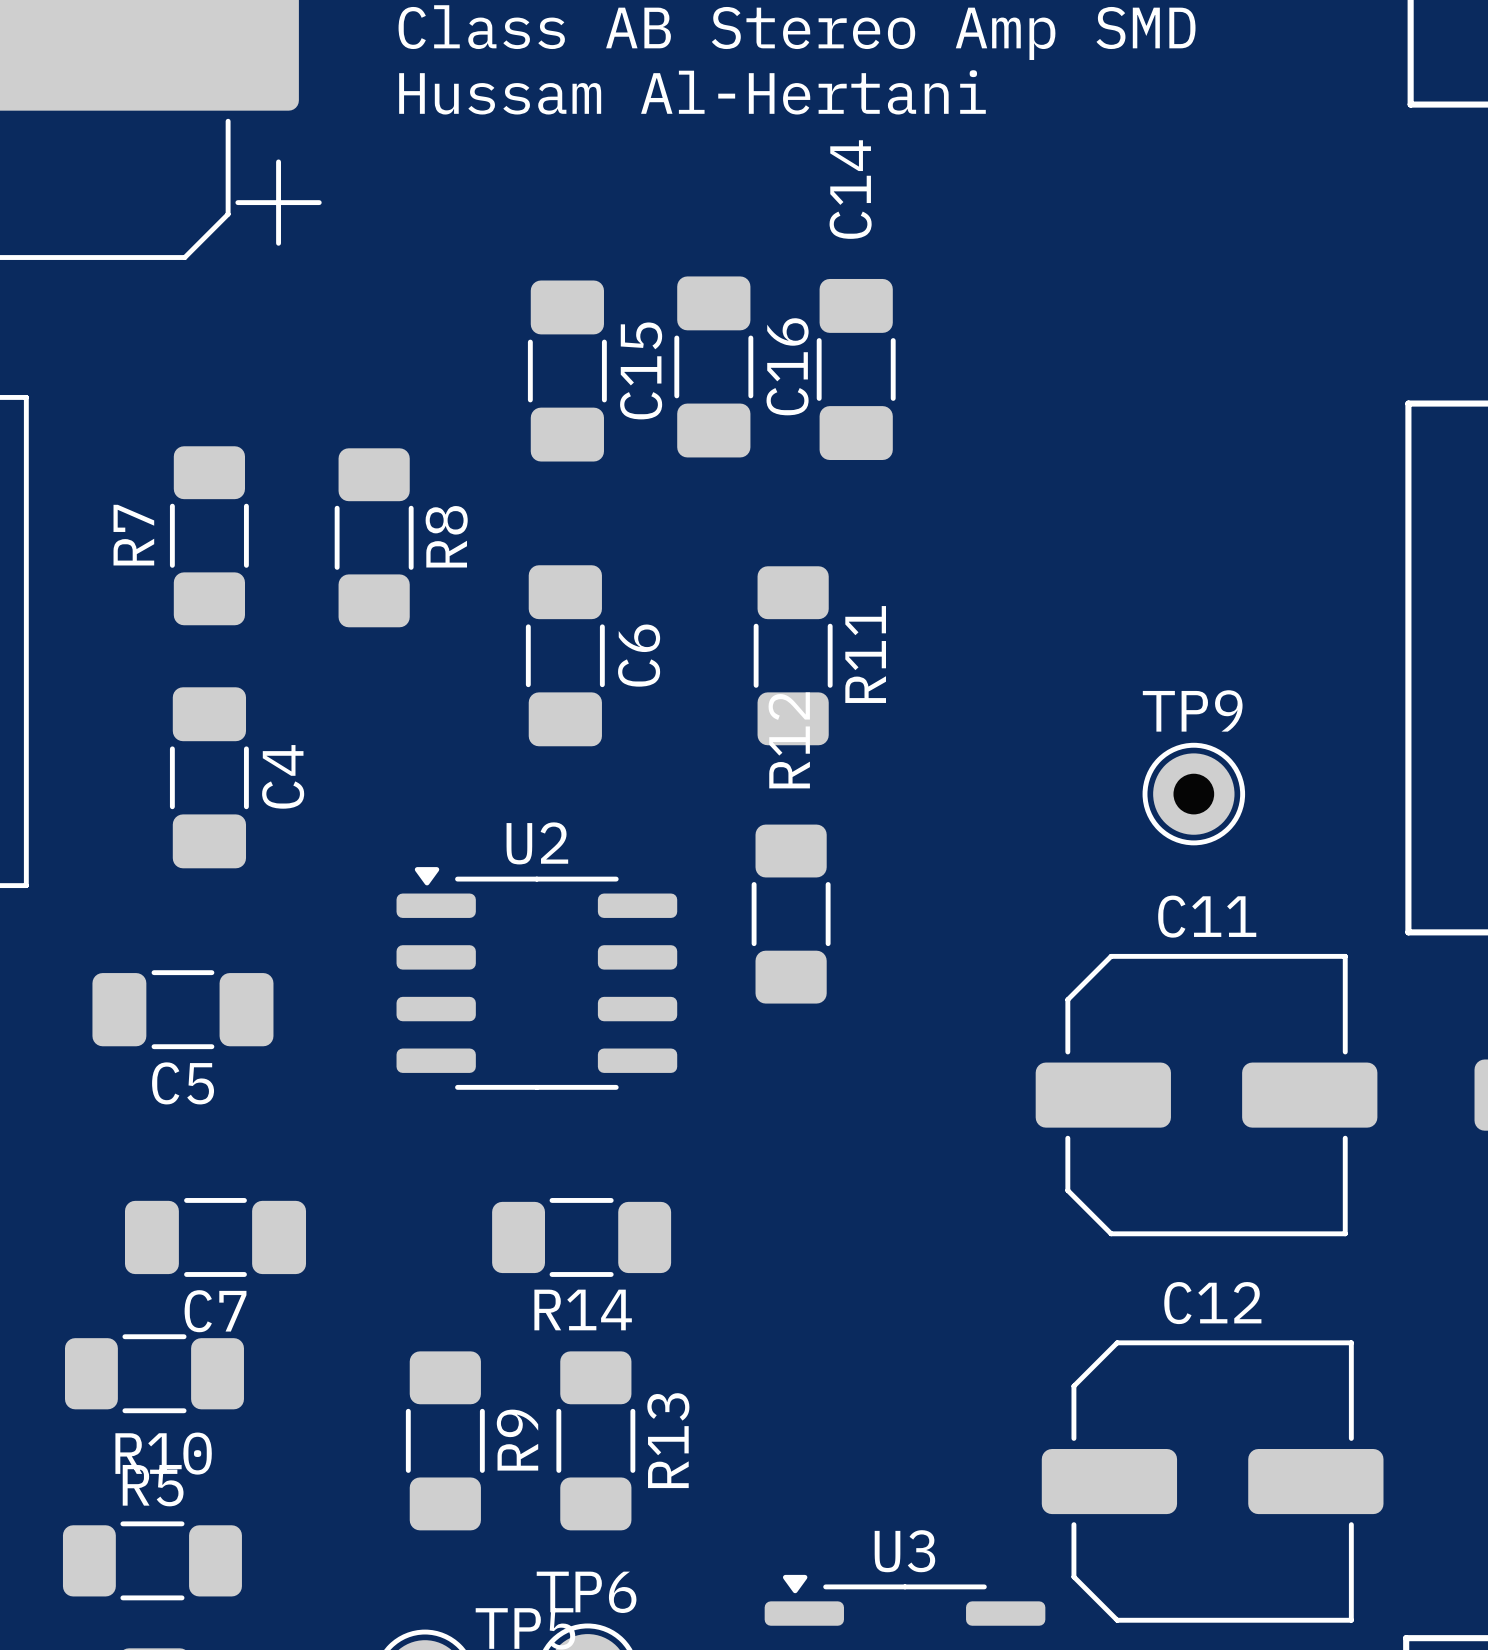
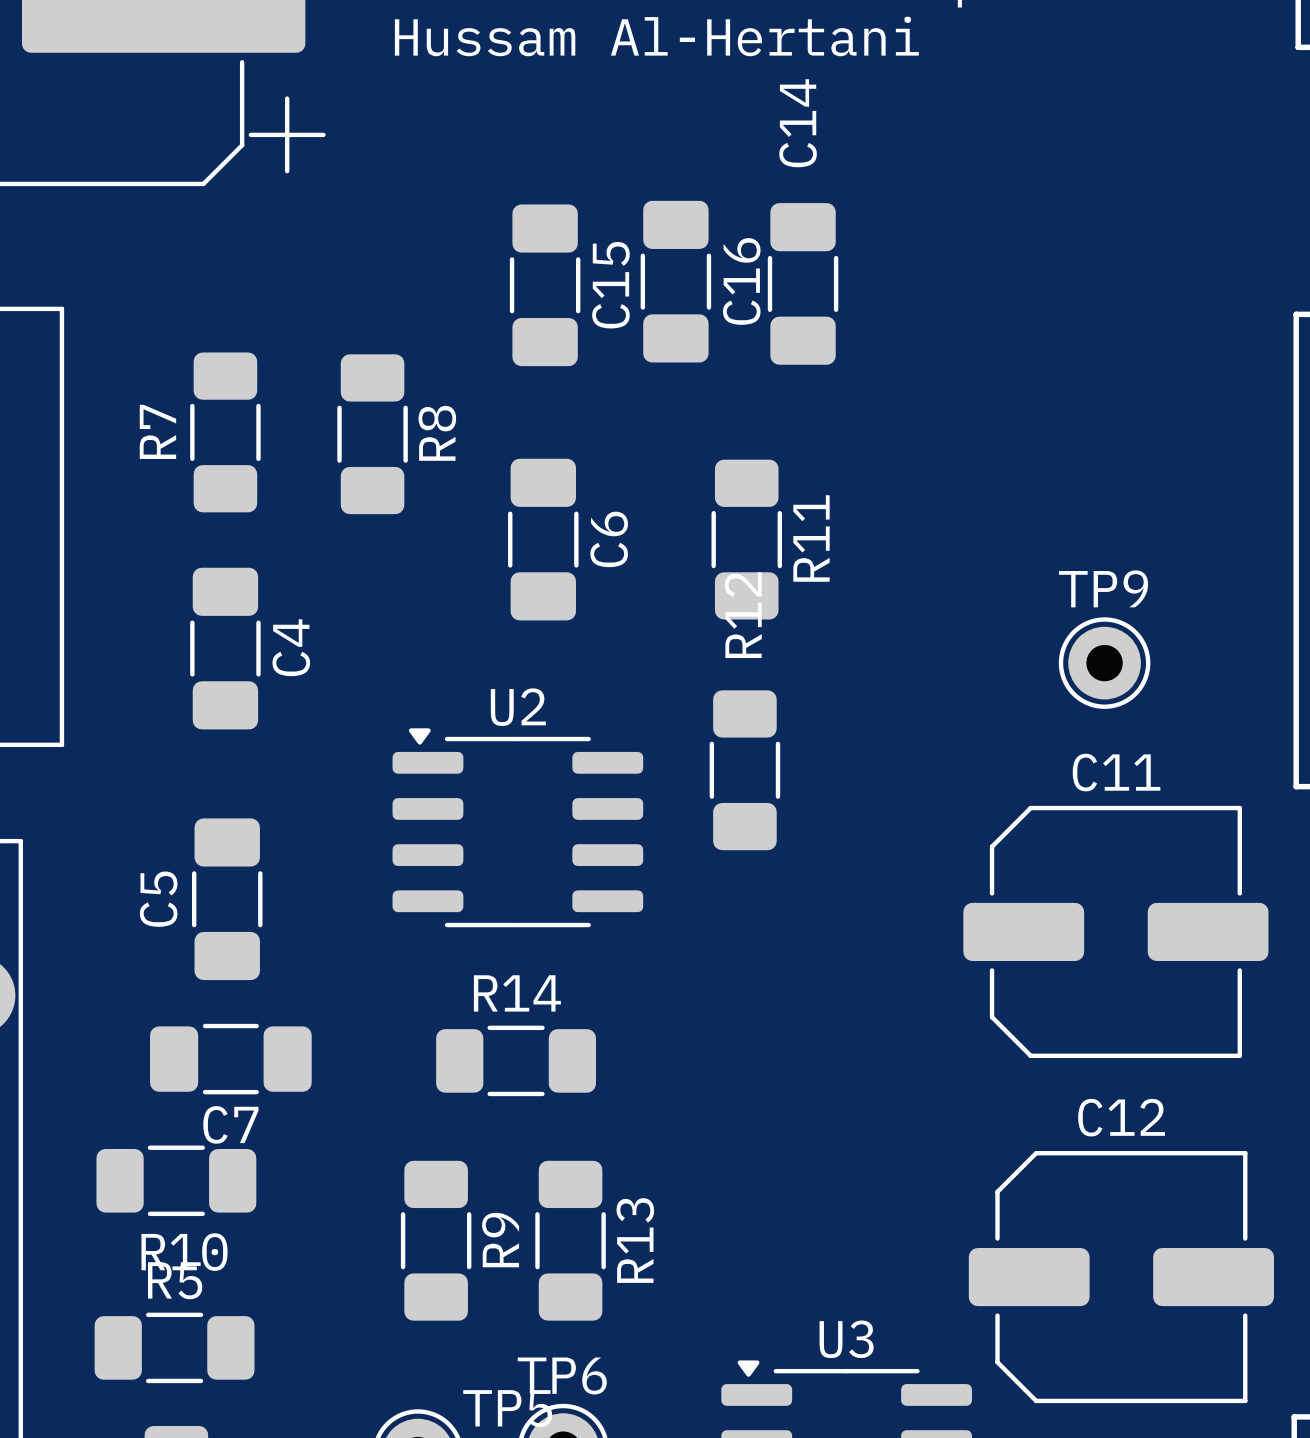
C5 rotation: 0° (182, 1009) -> 90° clockwise (227, 899)
R14 position: (581, 1237) -> (516, 1060)
R14 name position: R14 (583, 1309) -> R14 (517, 993)

